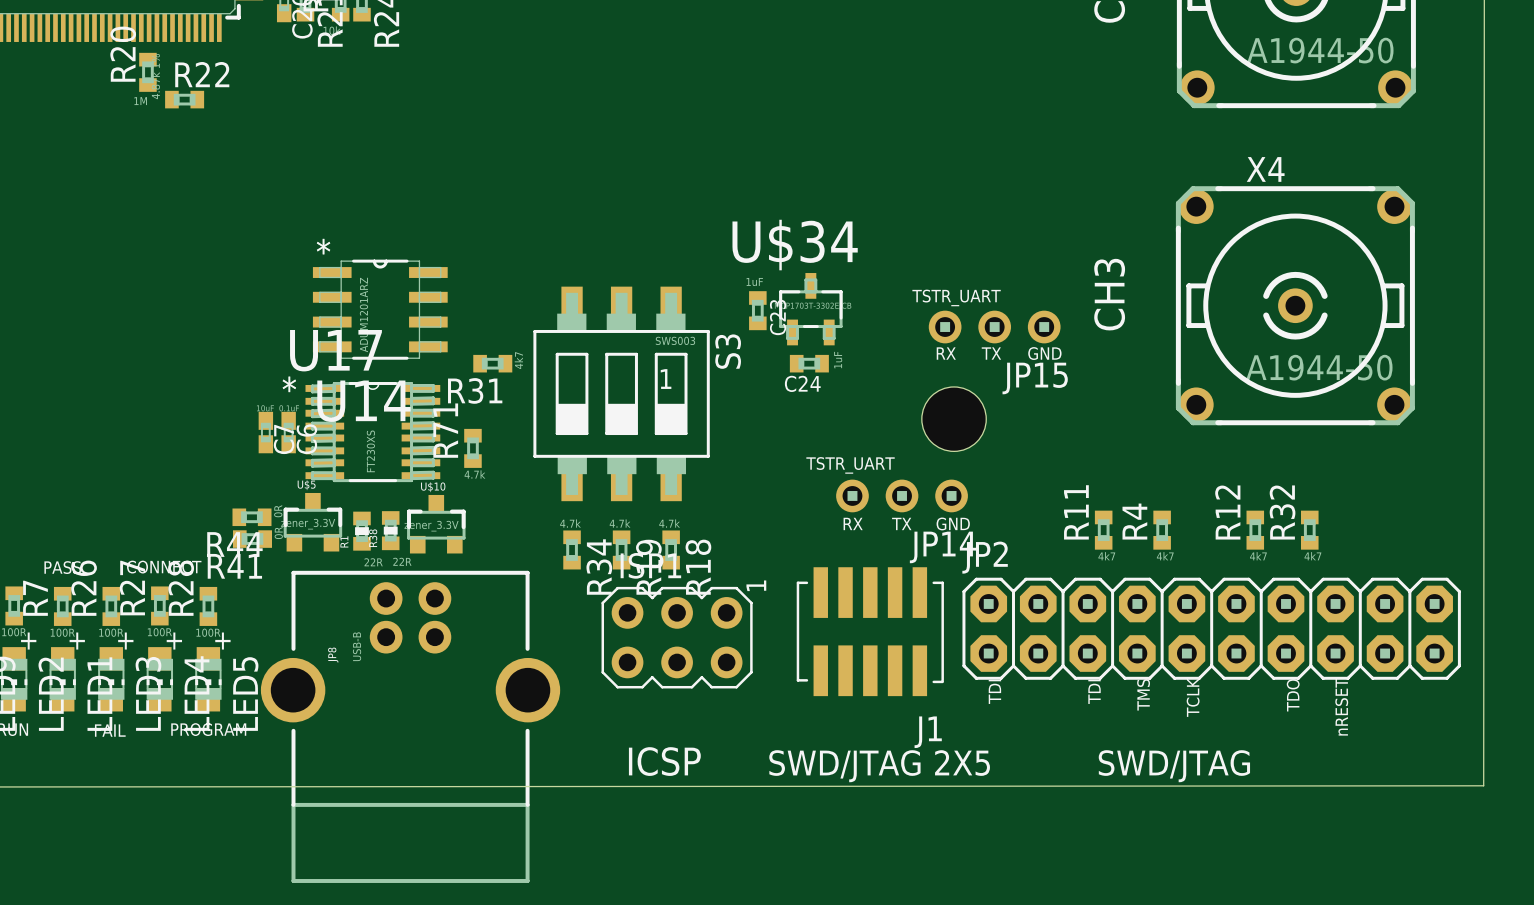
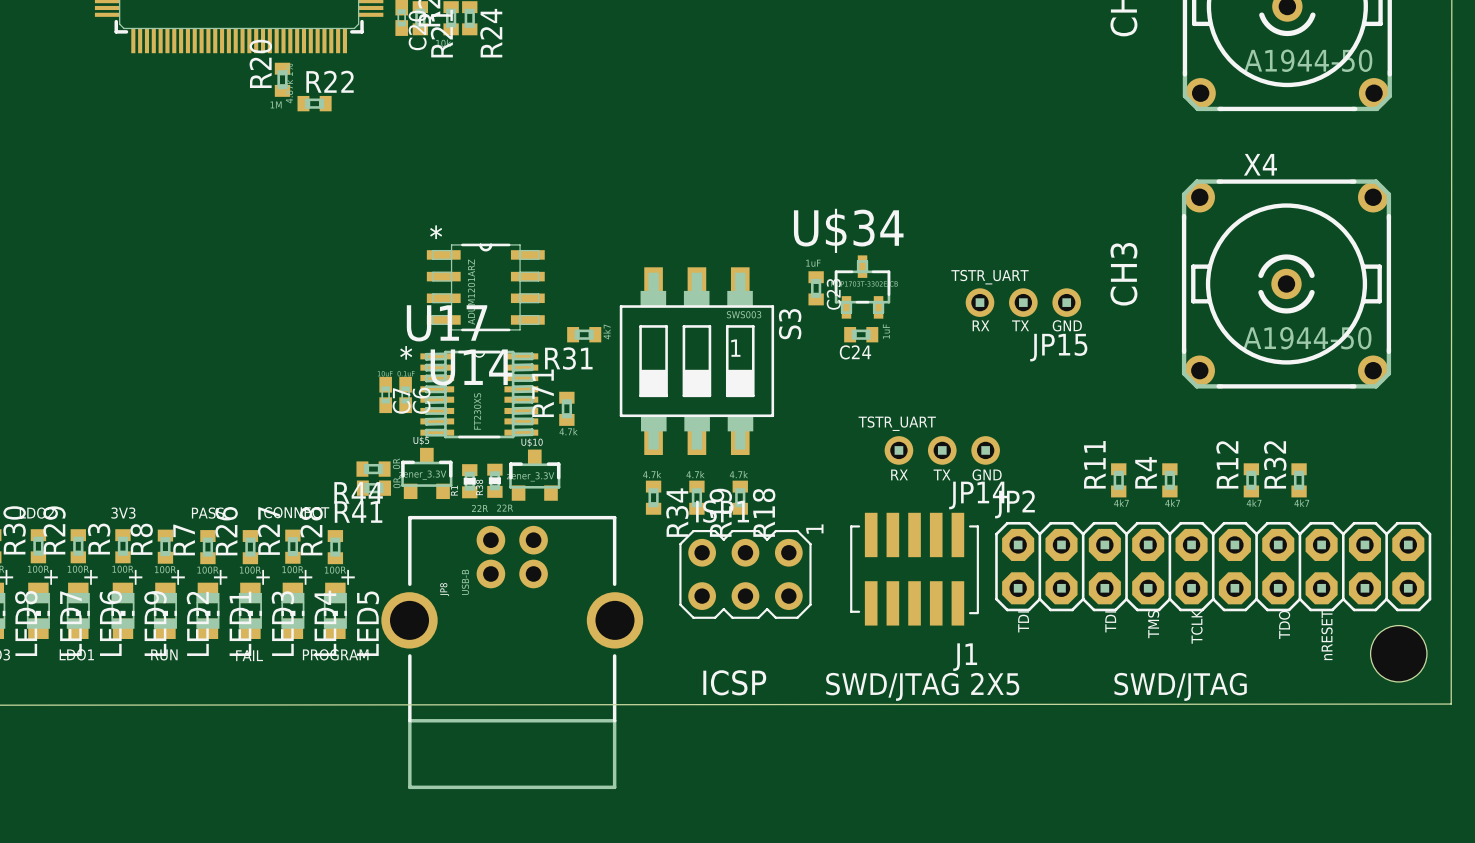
part: (954, 419) -> none
part: none -> (1398, 653)

